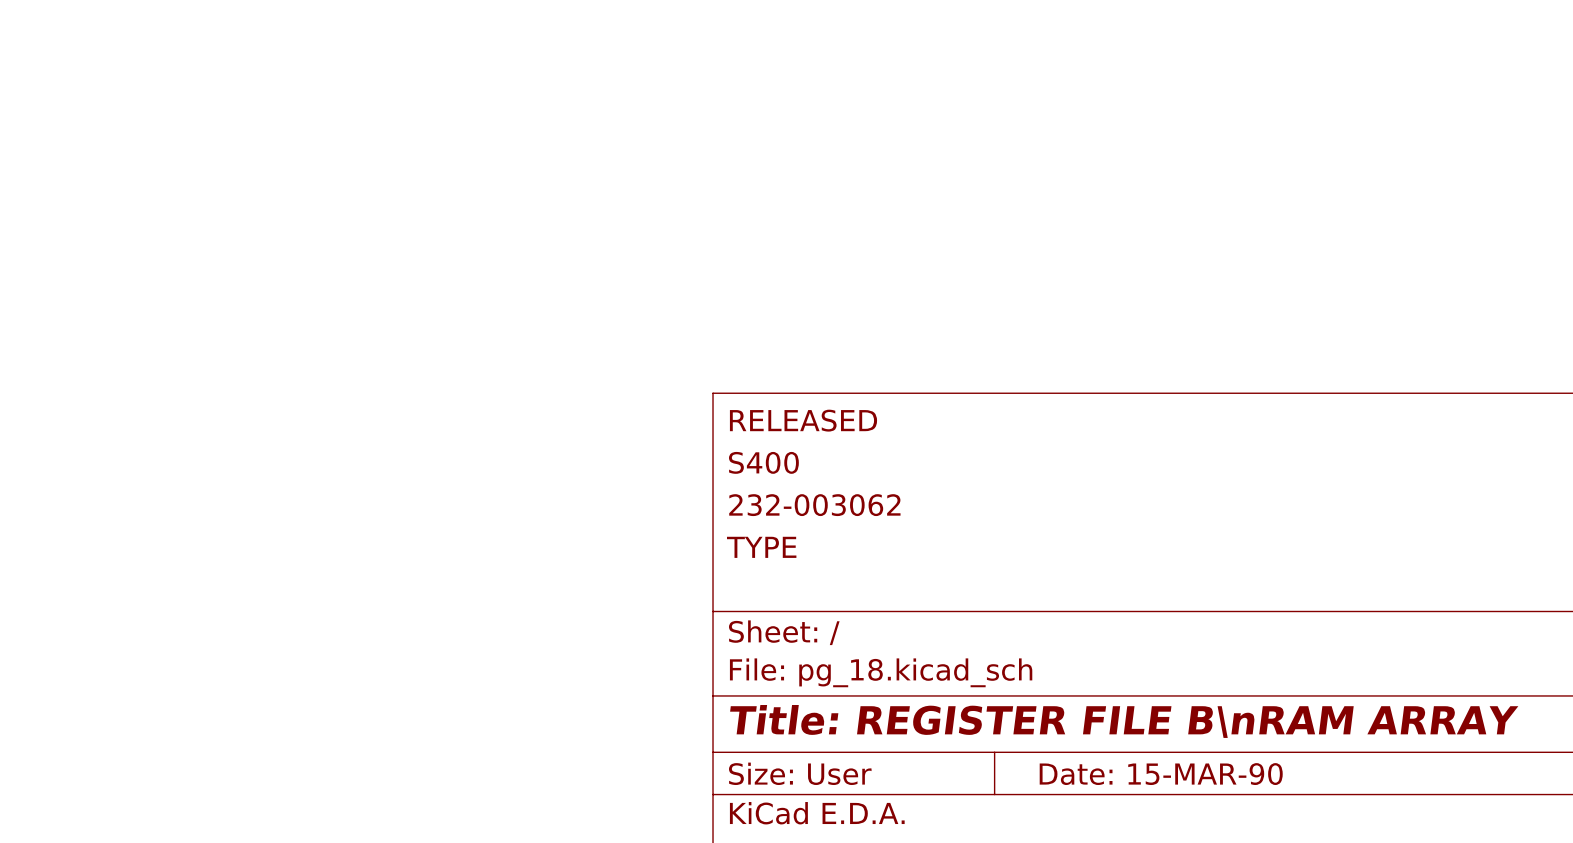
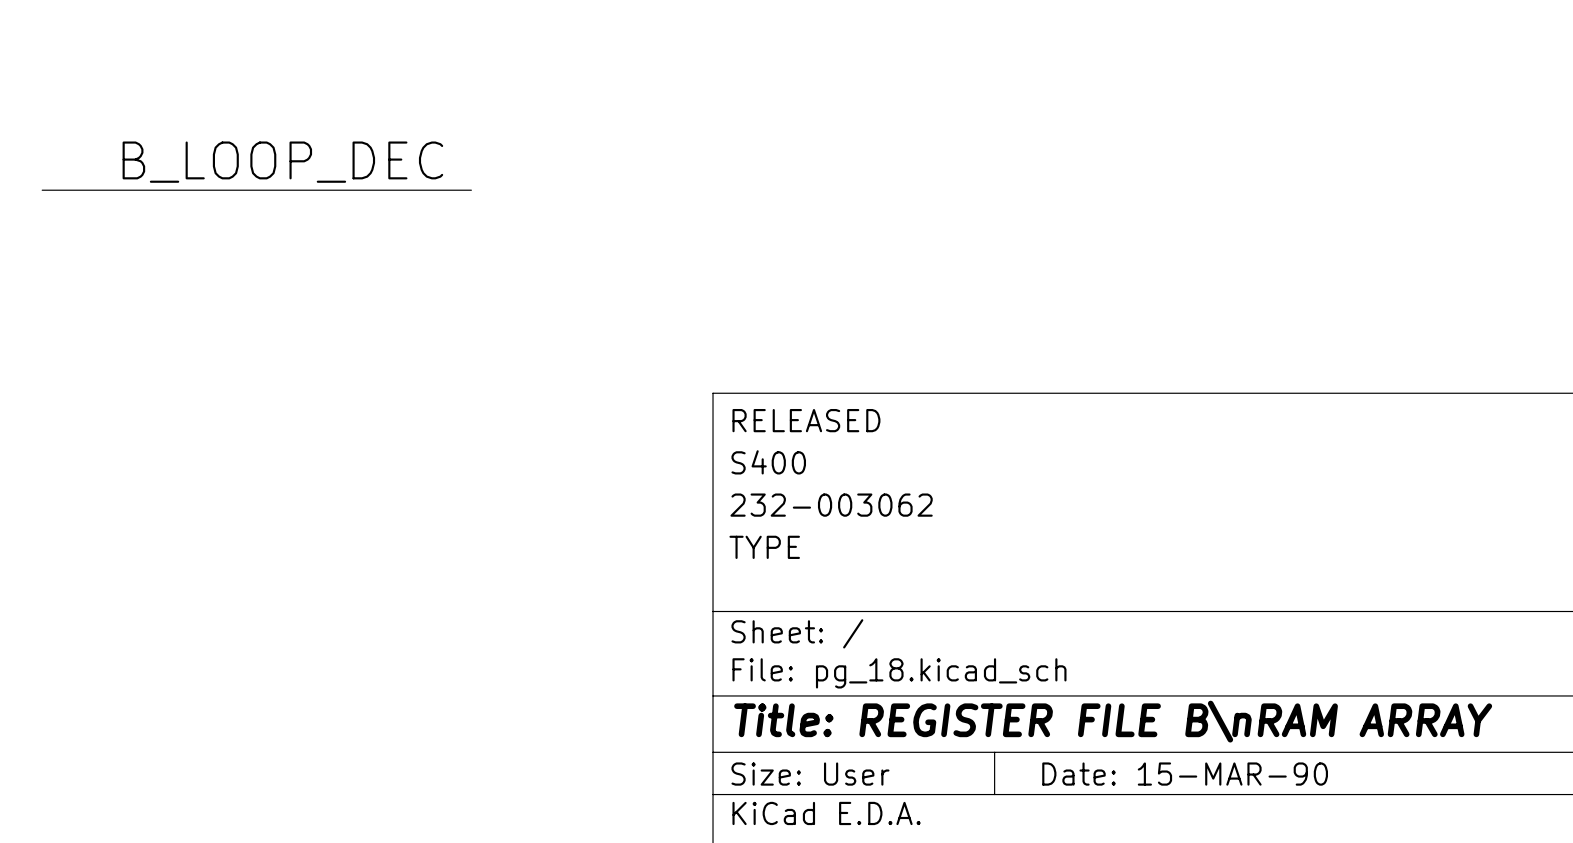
label: none -> B_LOOP_DEC (282, 162)
wire: none -> (42, 190) (471, 190)

